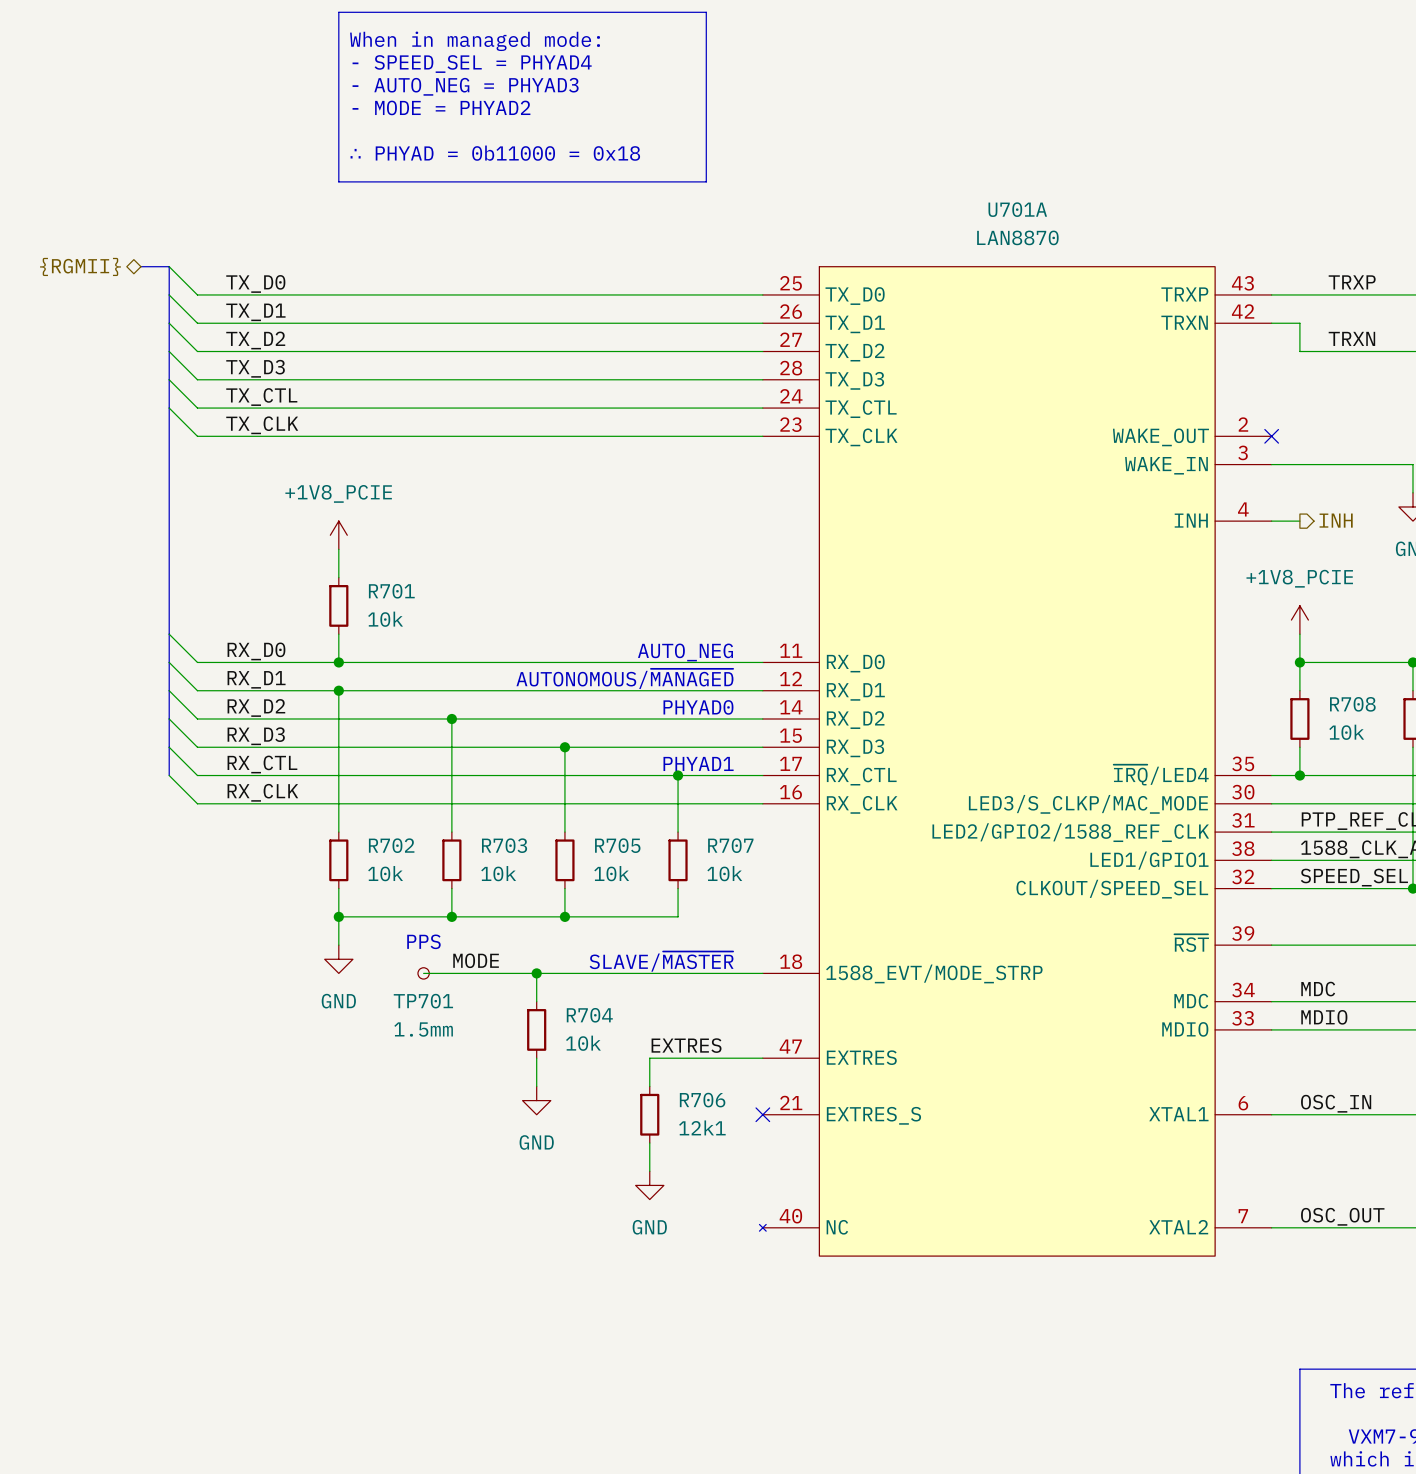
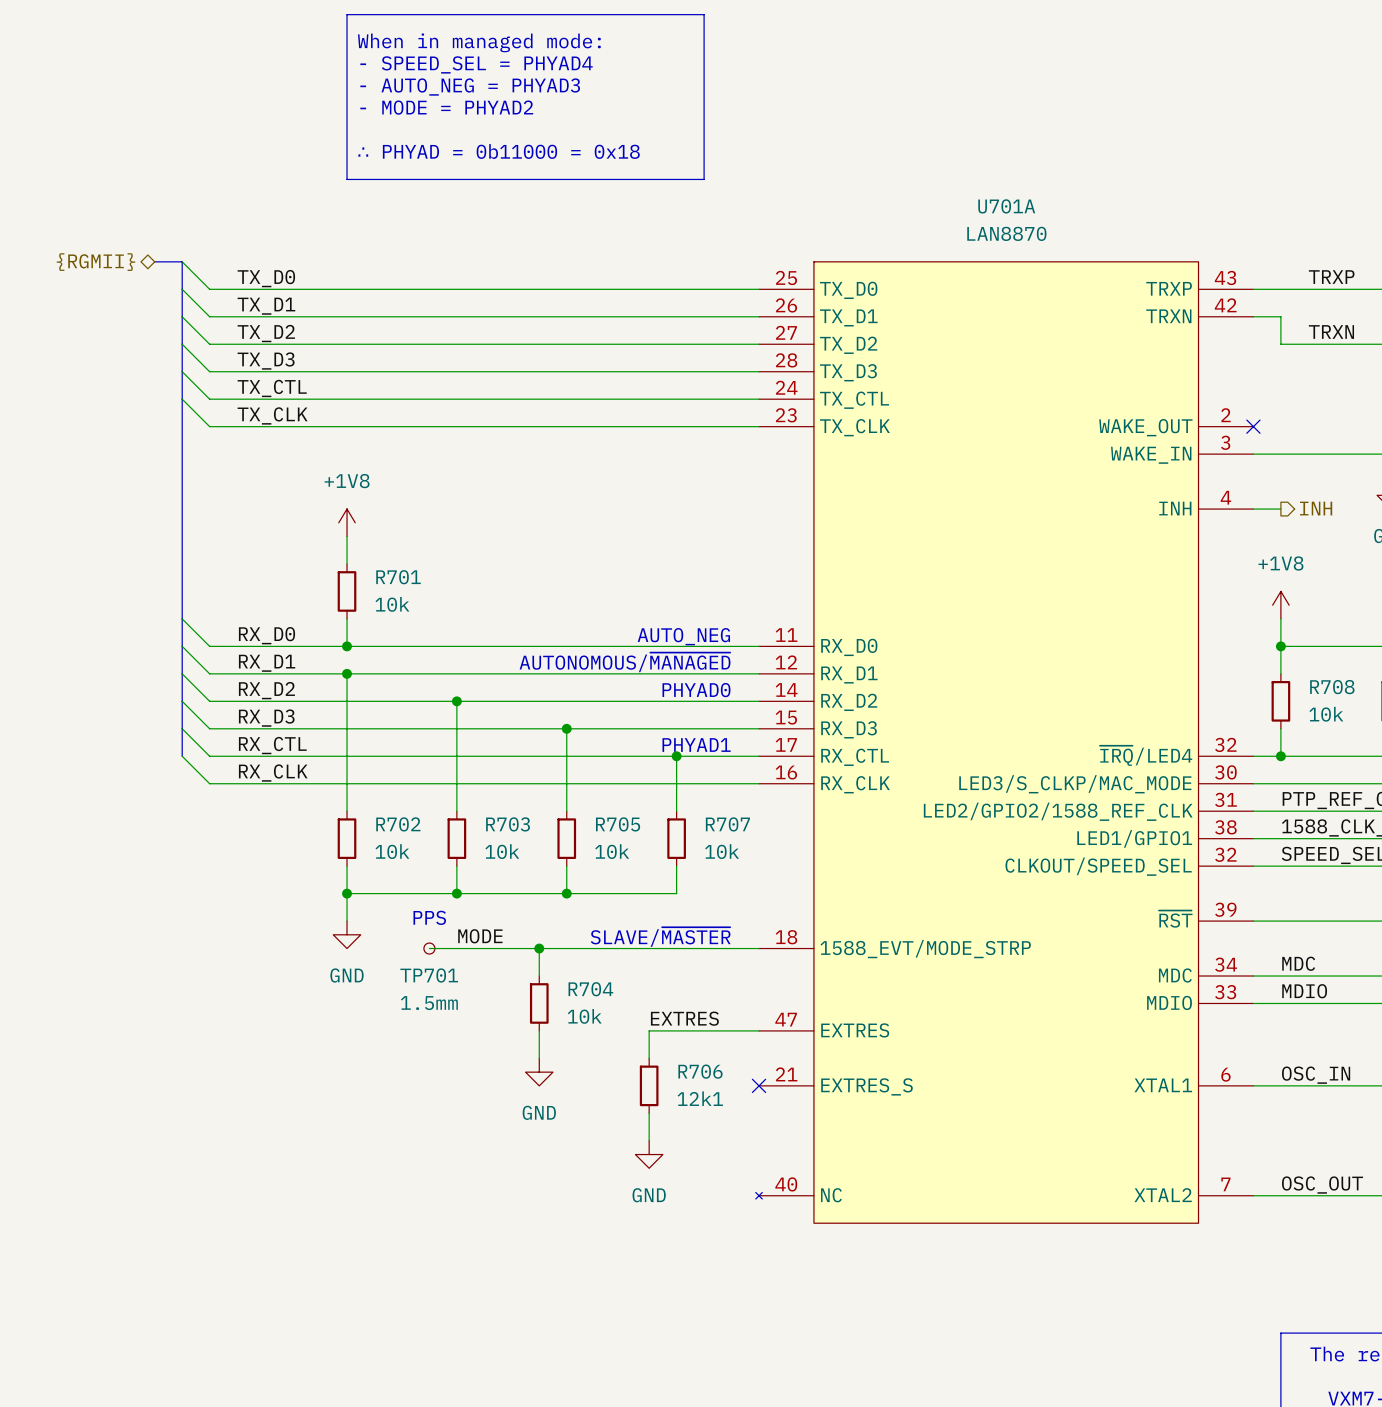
power symbol: +1V8_PCIE (338, 535) -> +1V8 (347, 522)
power symbol: +1V8_PCIE (1299, 620) -> +1V8 (1280, 605)
U701A pin number: 35 (1243, 763) -> 32 (1225, 744)

